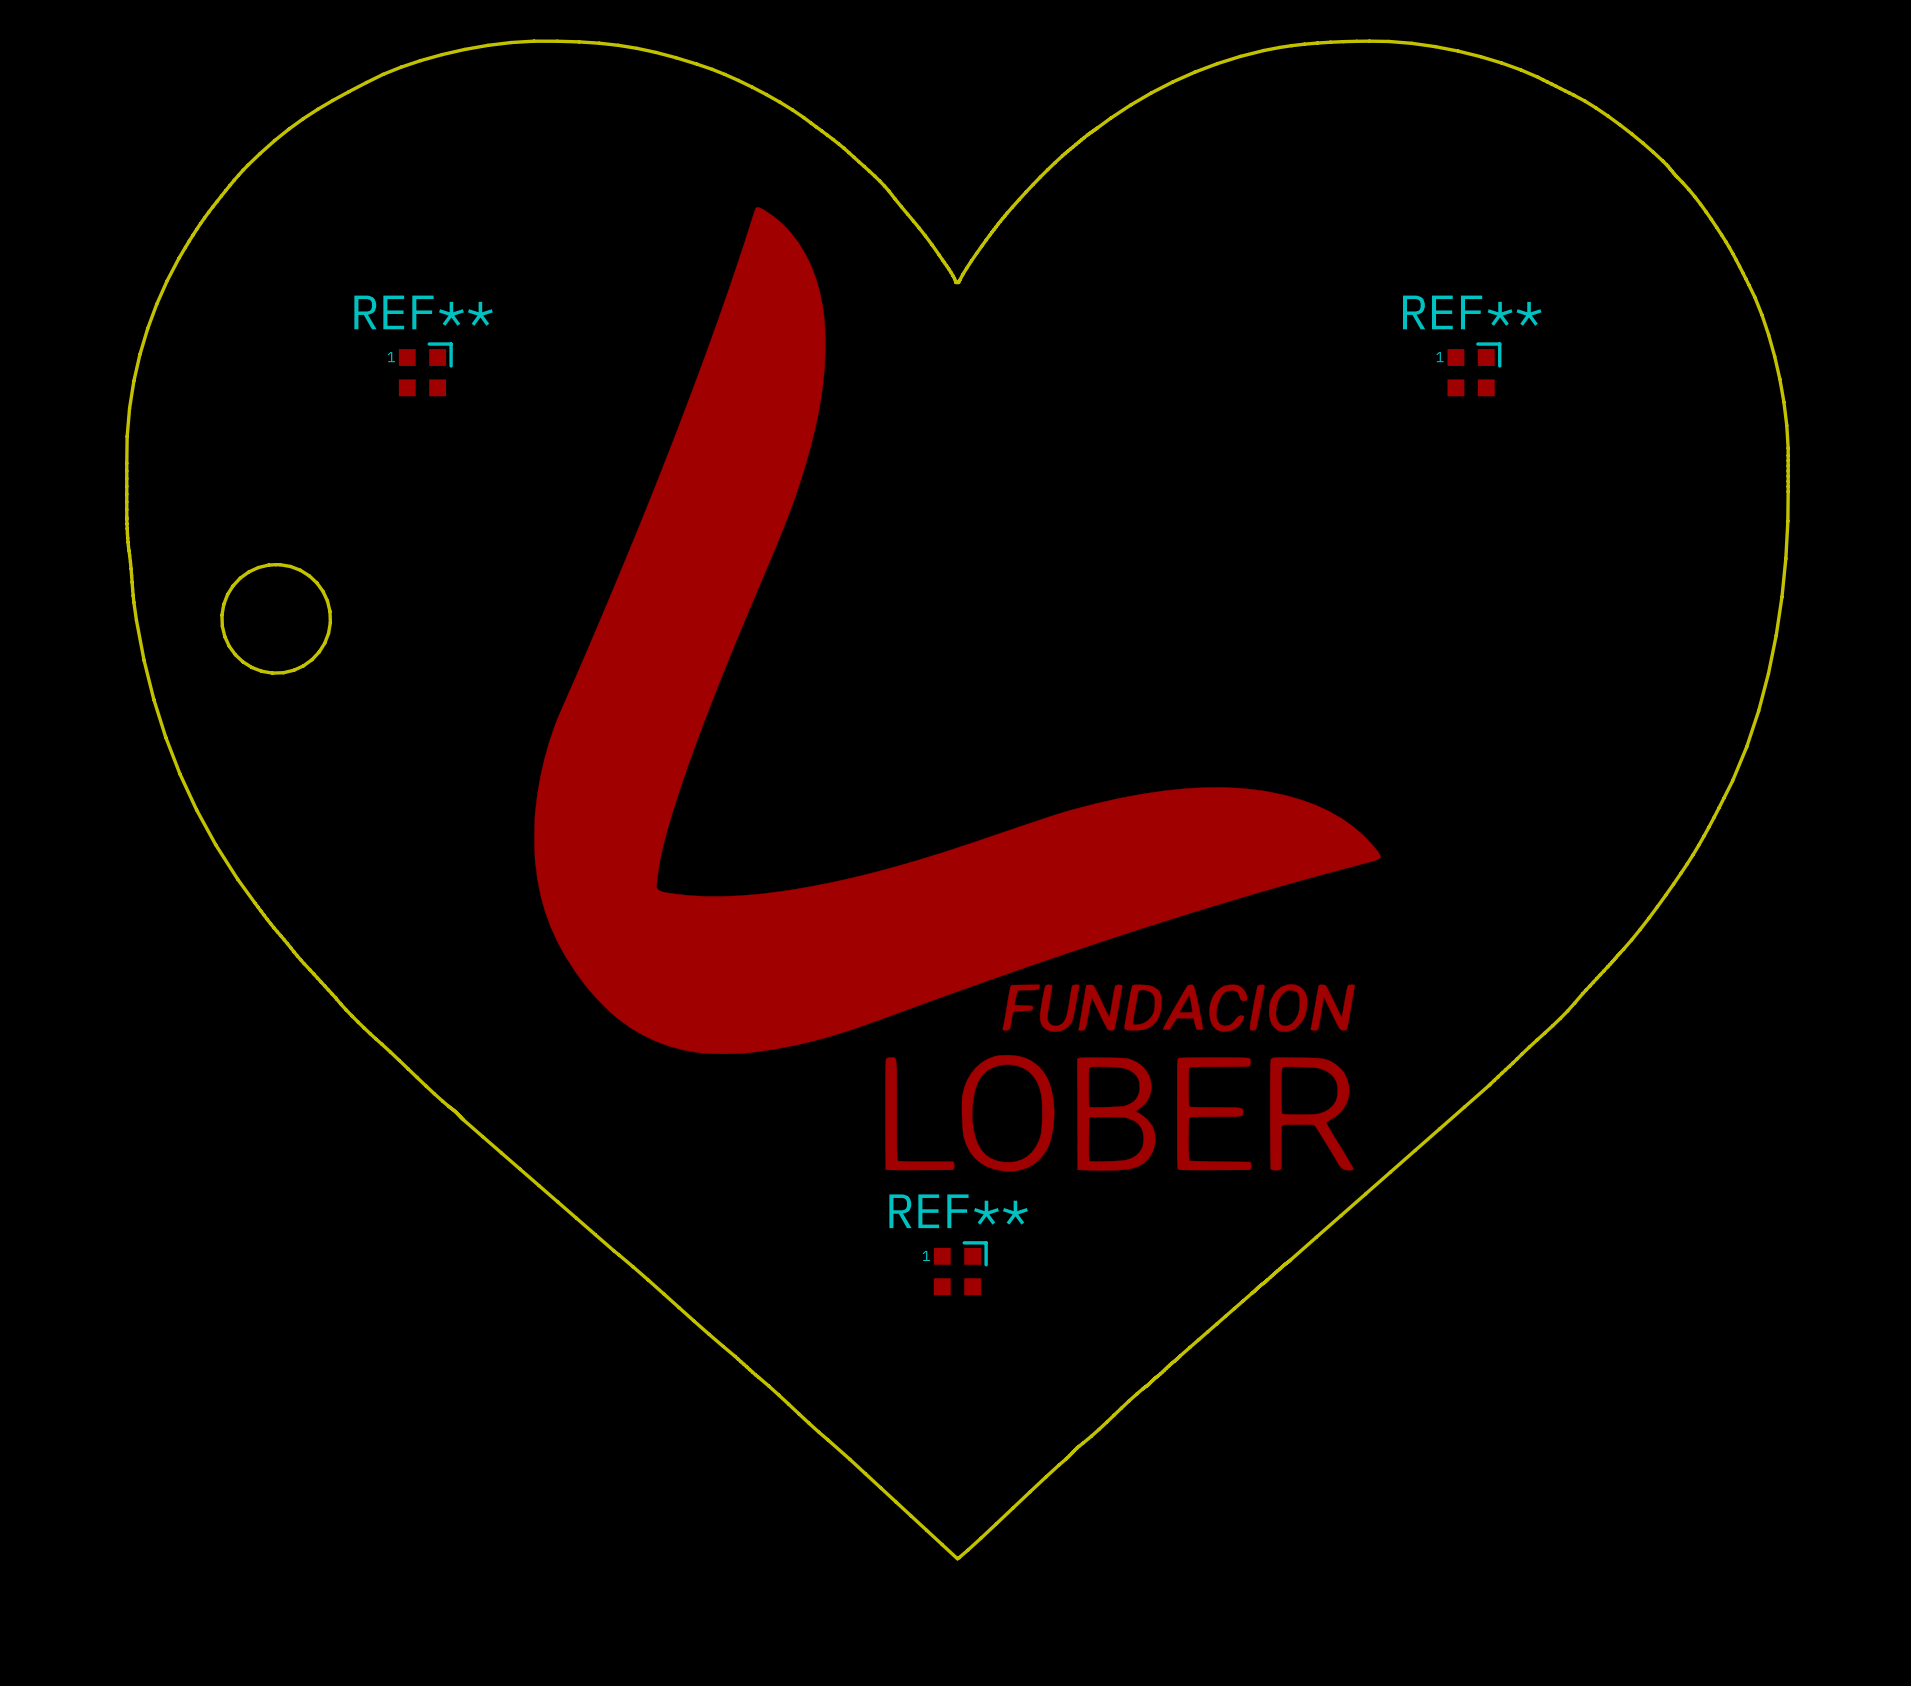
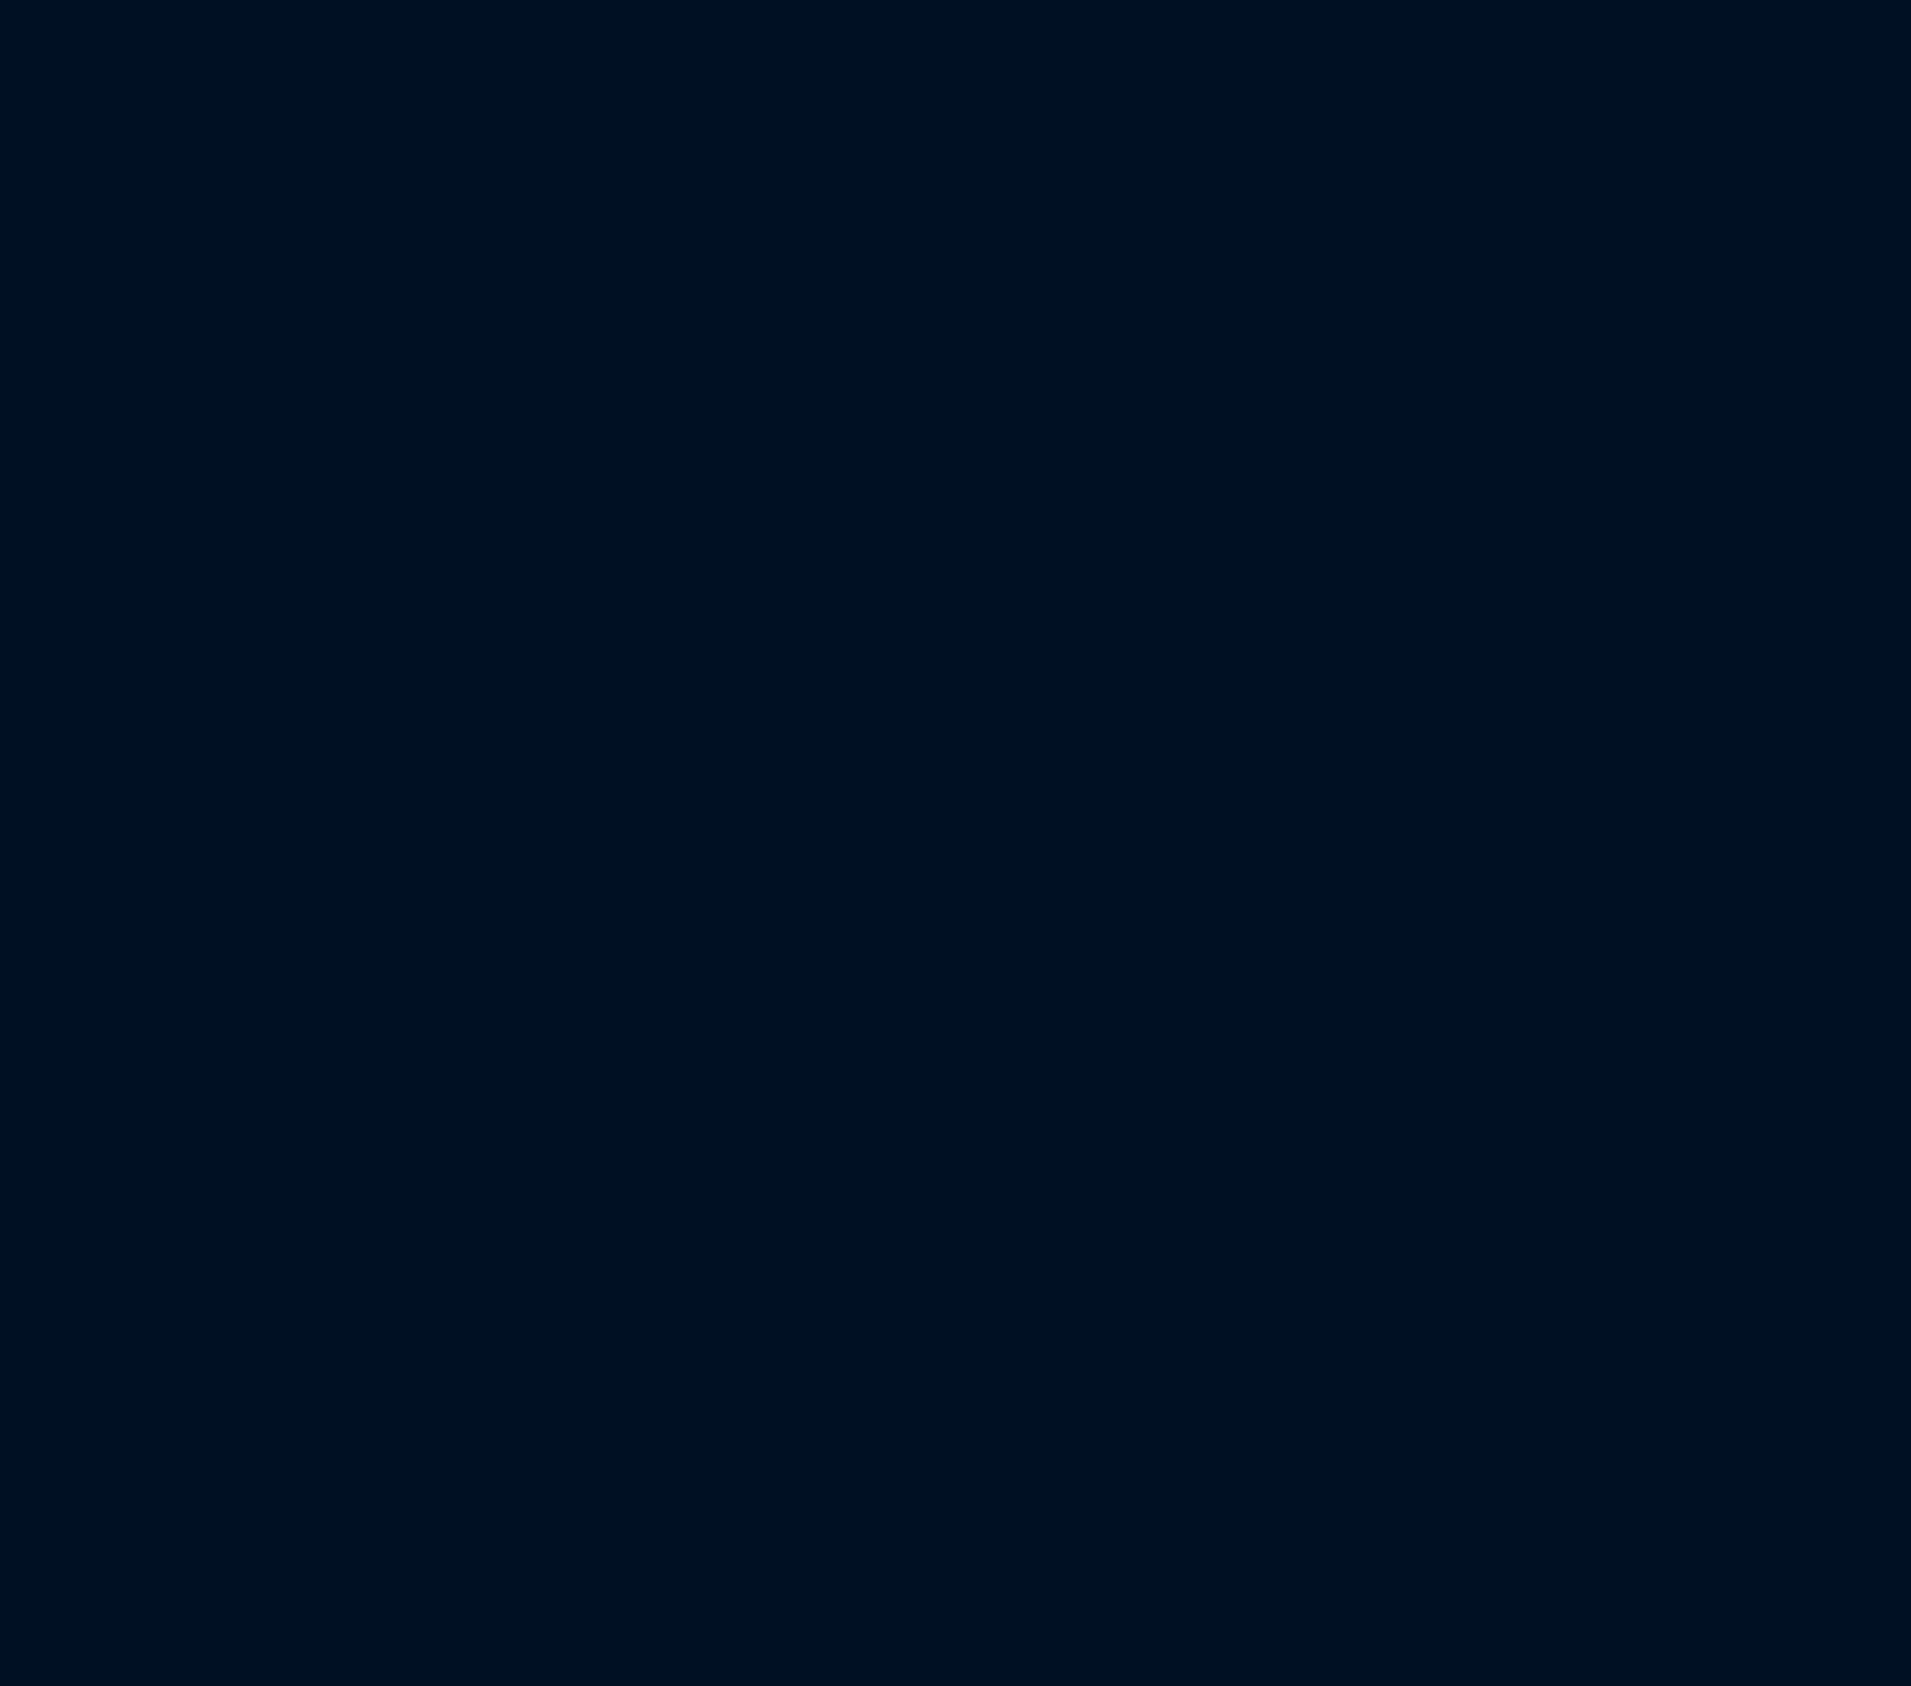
drawing: [125, 39, 1790, 1561] -> none
REF**: (425, 369) -> none
REF**: (1474, 369) -> none
REF**: (960, 1268) -> none

